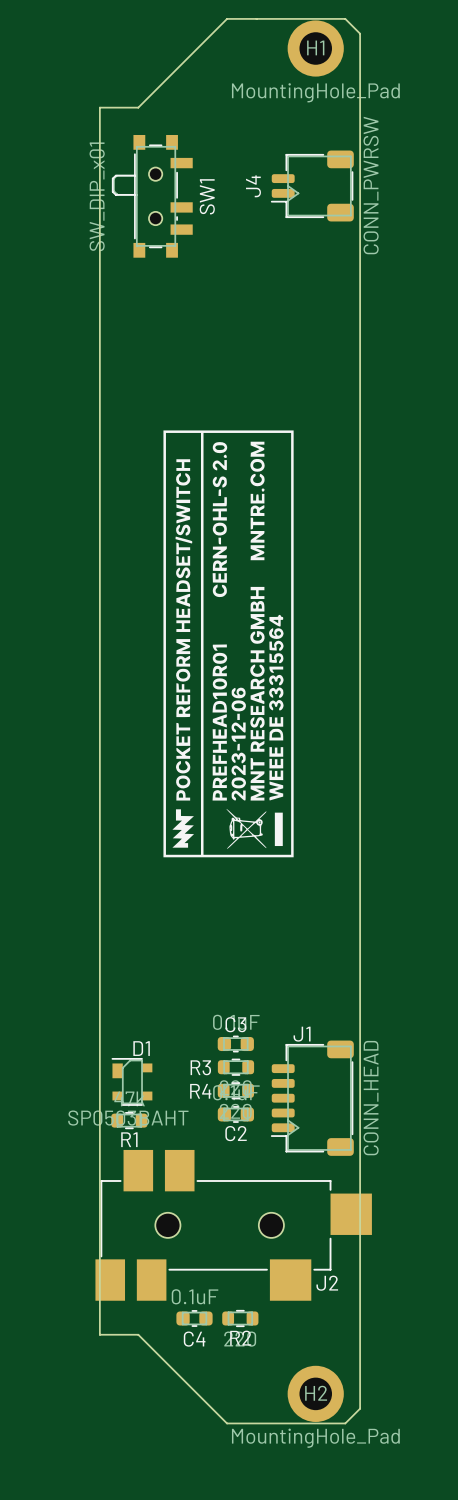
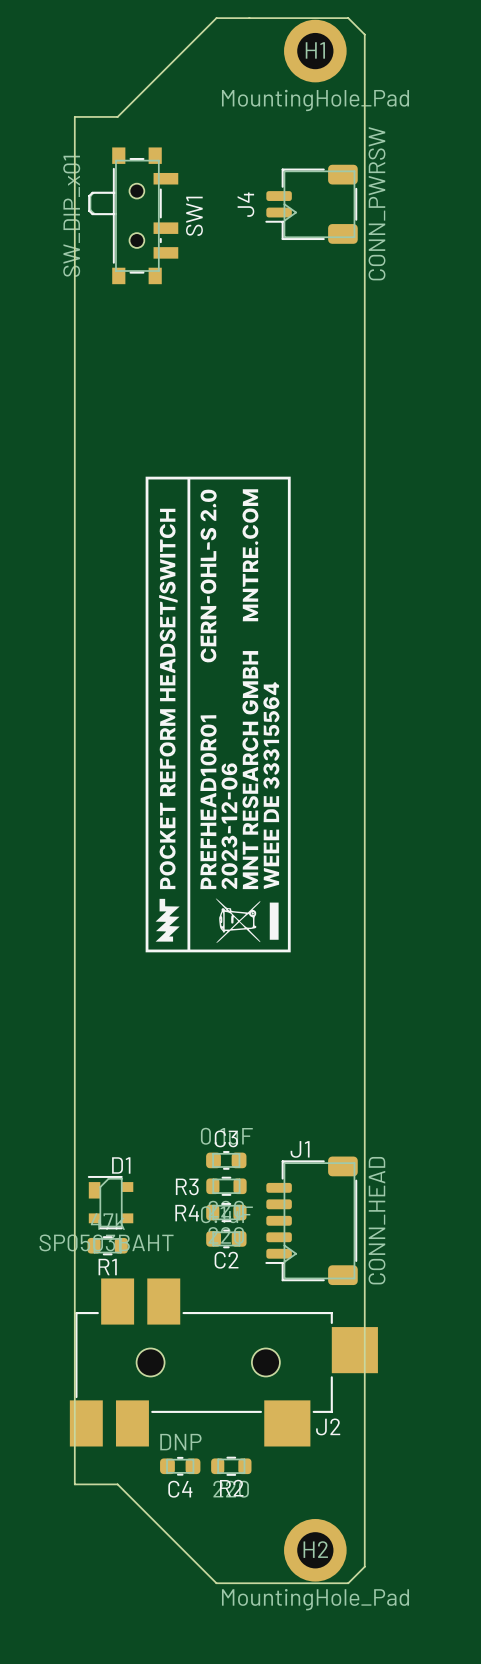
C4 value: 0.1uF (195, 1296) -> DNP (180, 1442)

